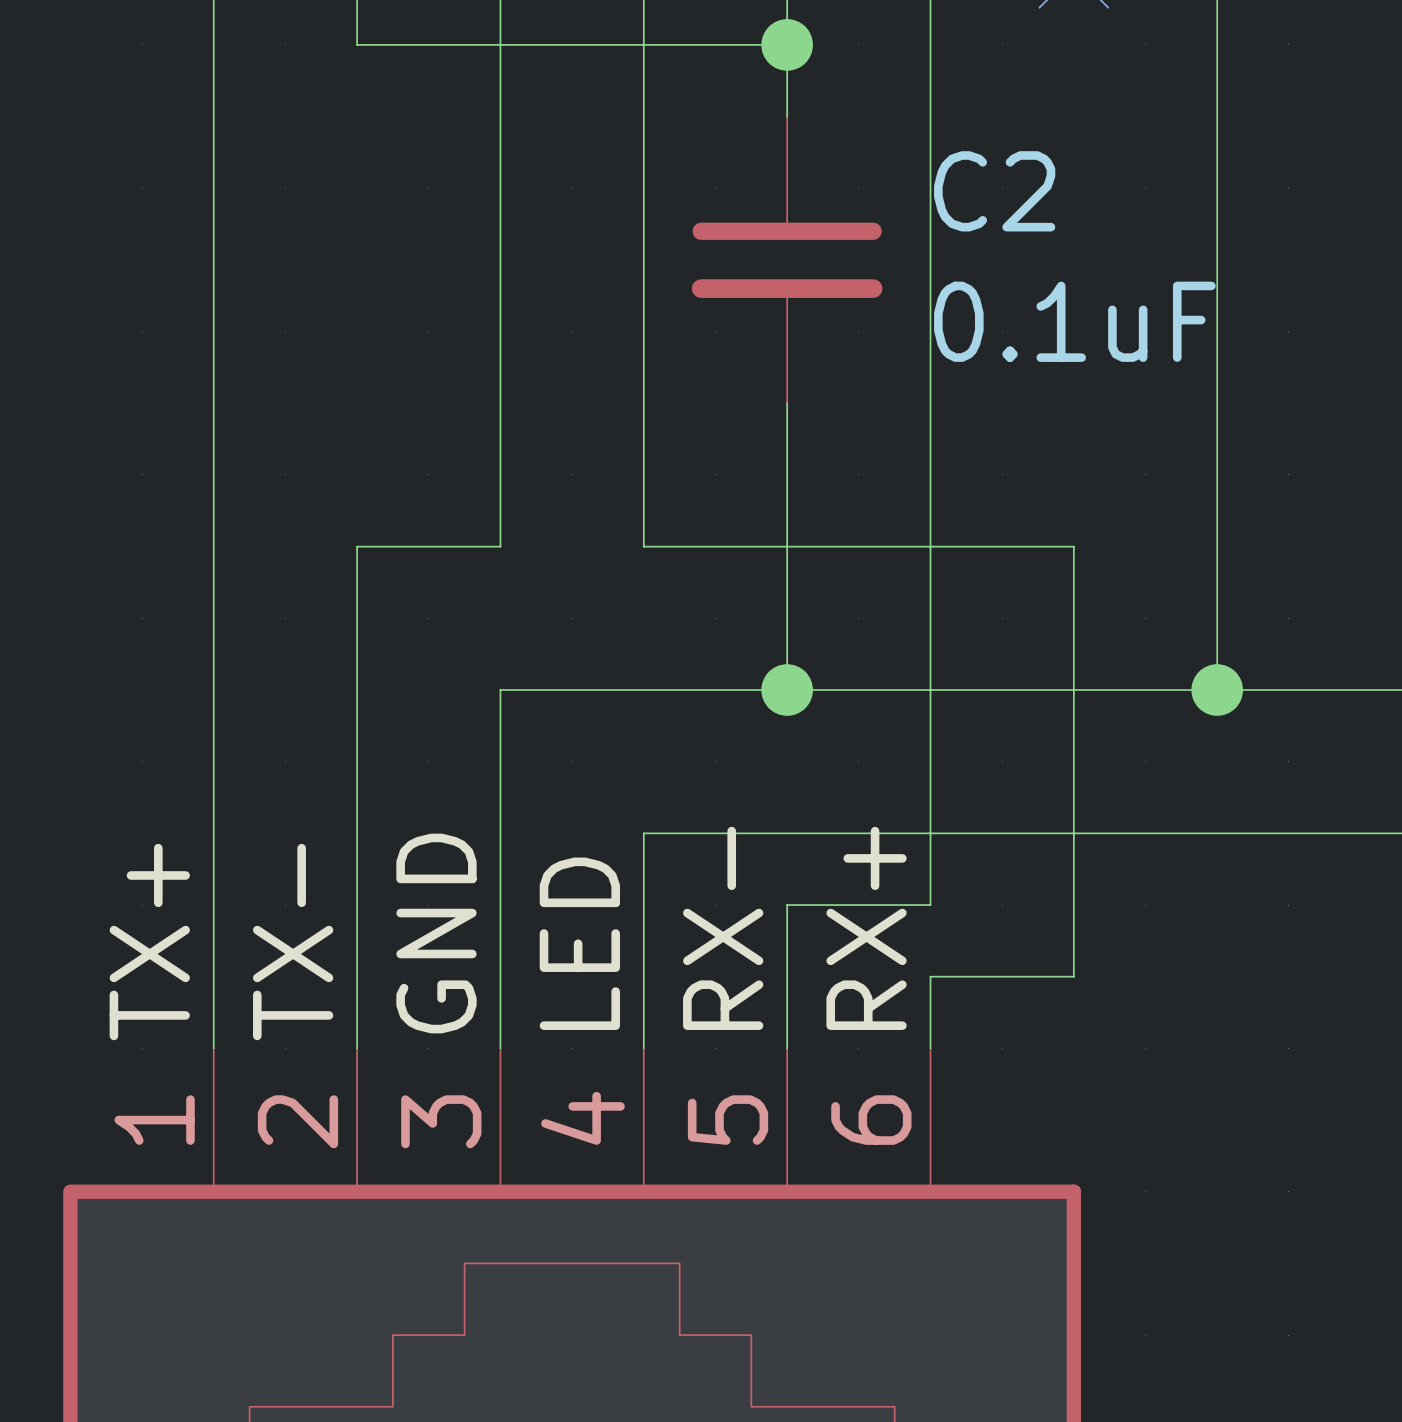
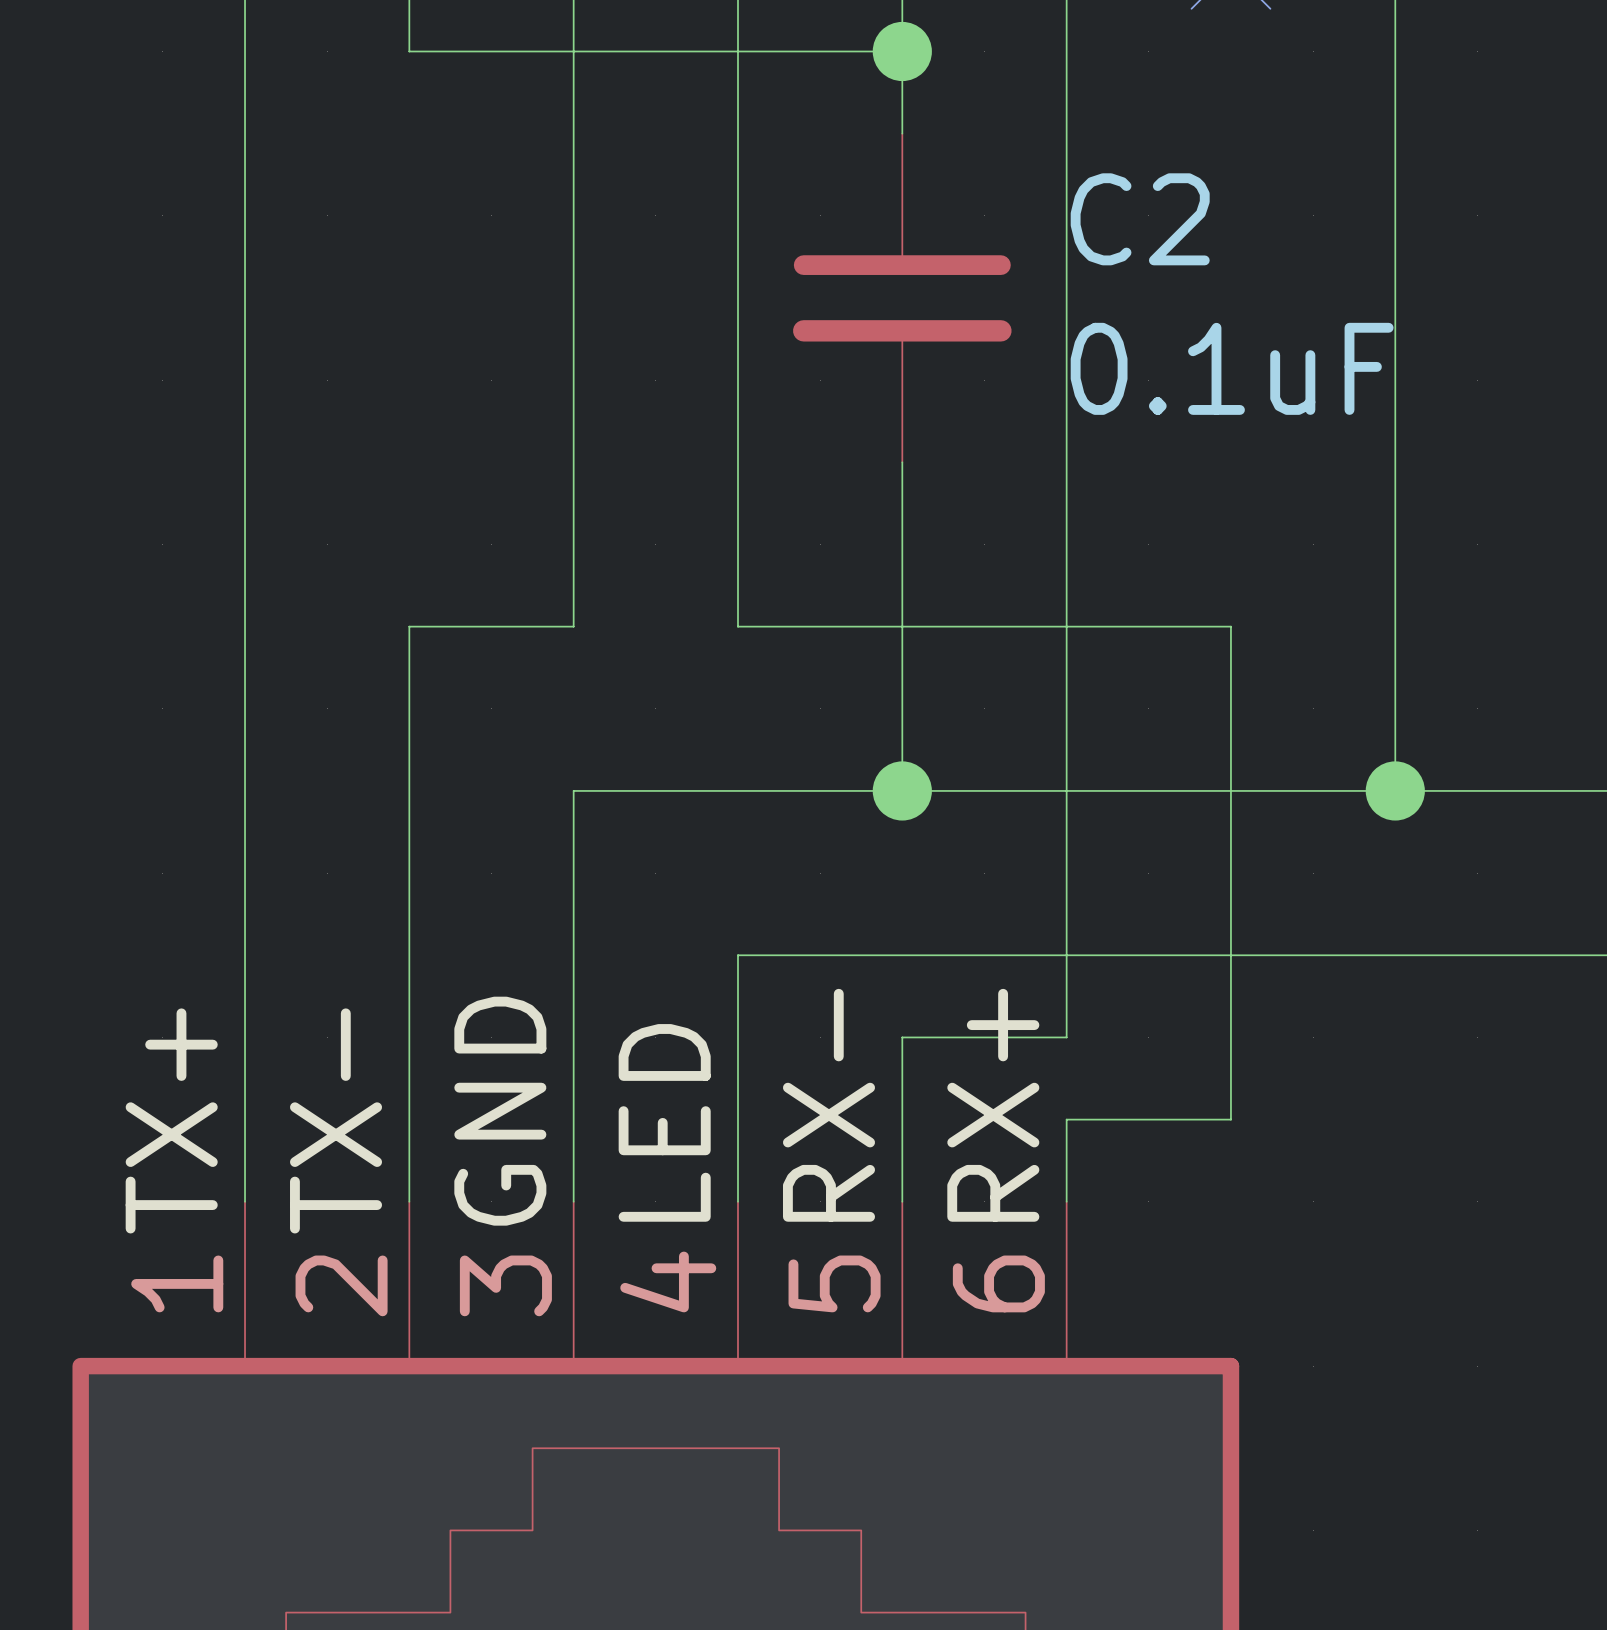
label position: RX- (723, 928) -> RX- (828, 1105)
label position: RX+ (866, 928) -> RX+ (993, 1105)
label position: GND (436, 933) -> GND (500, 1111)
label position: TX+ (149, 942) -> TX+ (171, 1120)
label position: TX- (293, 942) -> TX- (336, 1120)
label position: LED (579, 943) -> LED (664, 1122)

